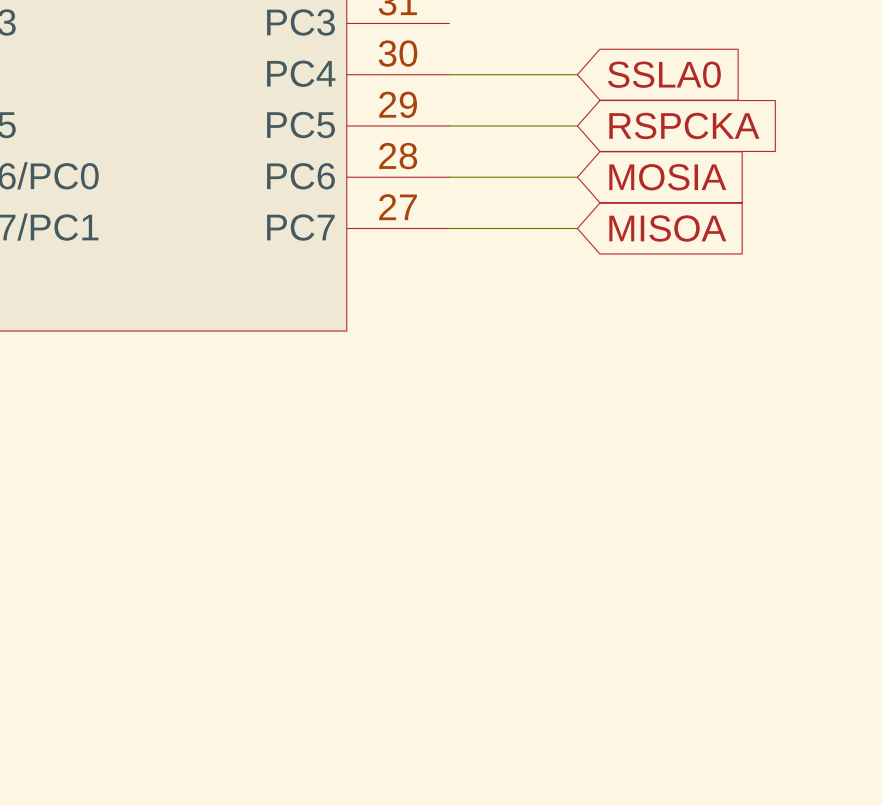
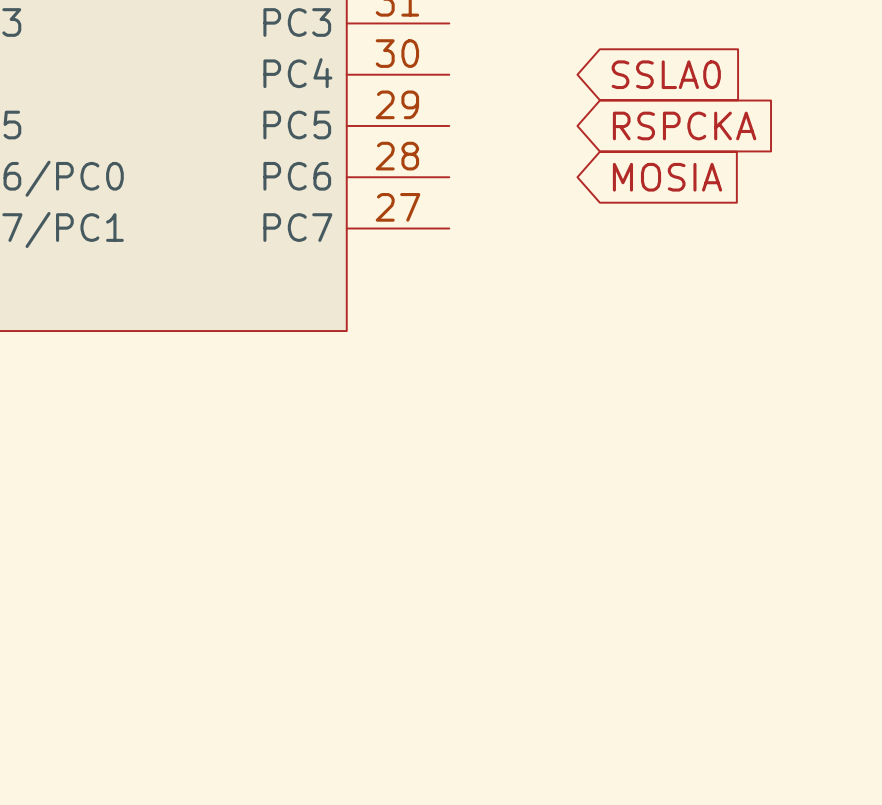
wire: (449, 74) (577, 74) -> none
wire: (449, 125) (577, 125) -> none
wire: (449, 177) (577, 177) -> none
wire: (449, 228) (577, 228) -> none
global label: MISOA (667, 228) -> none

